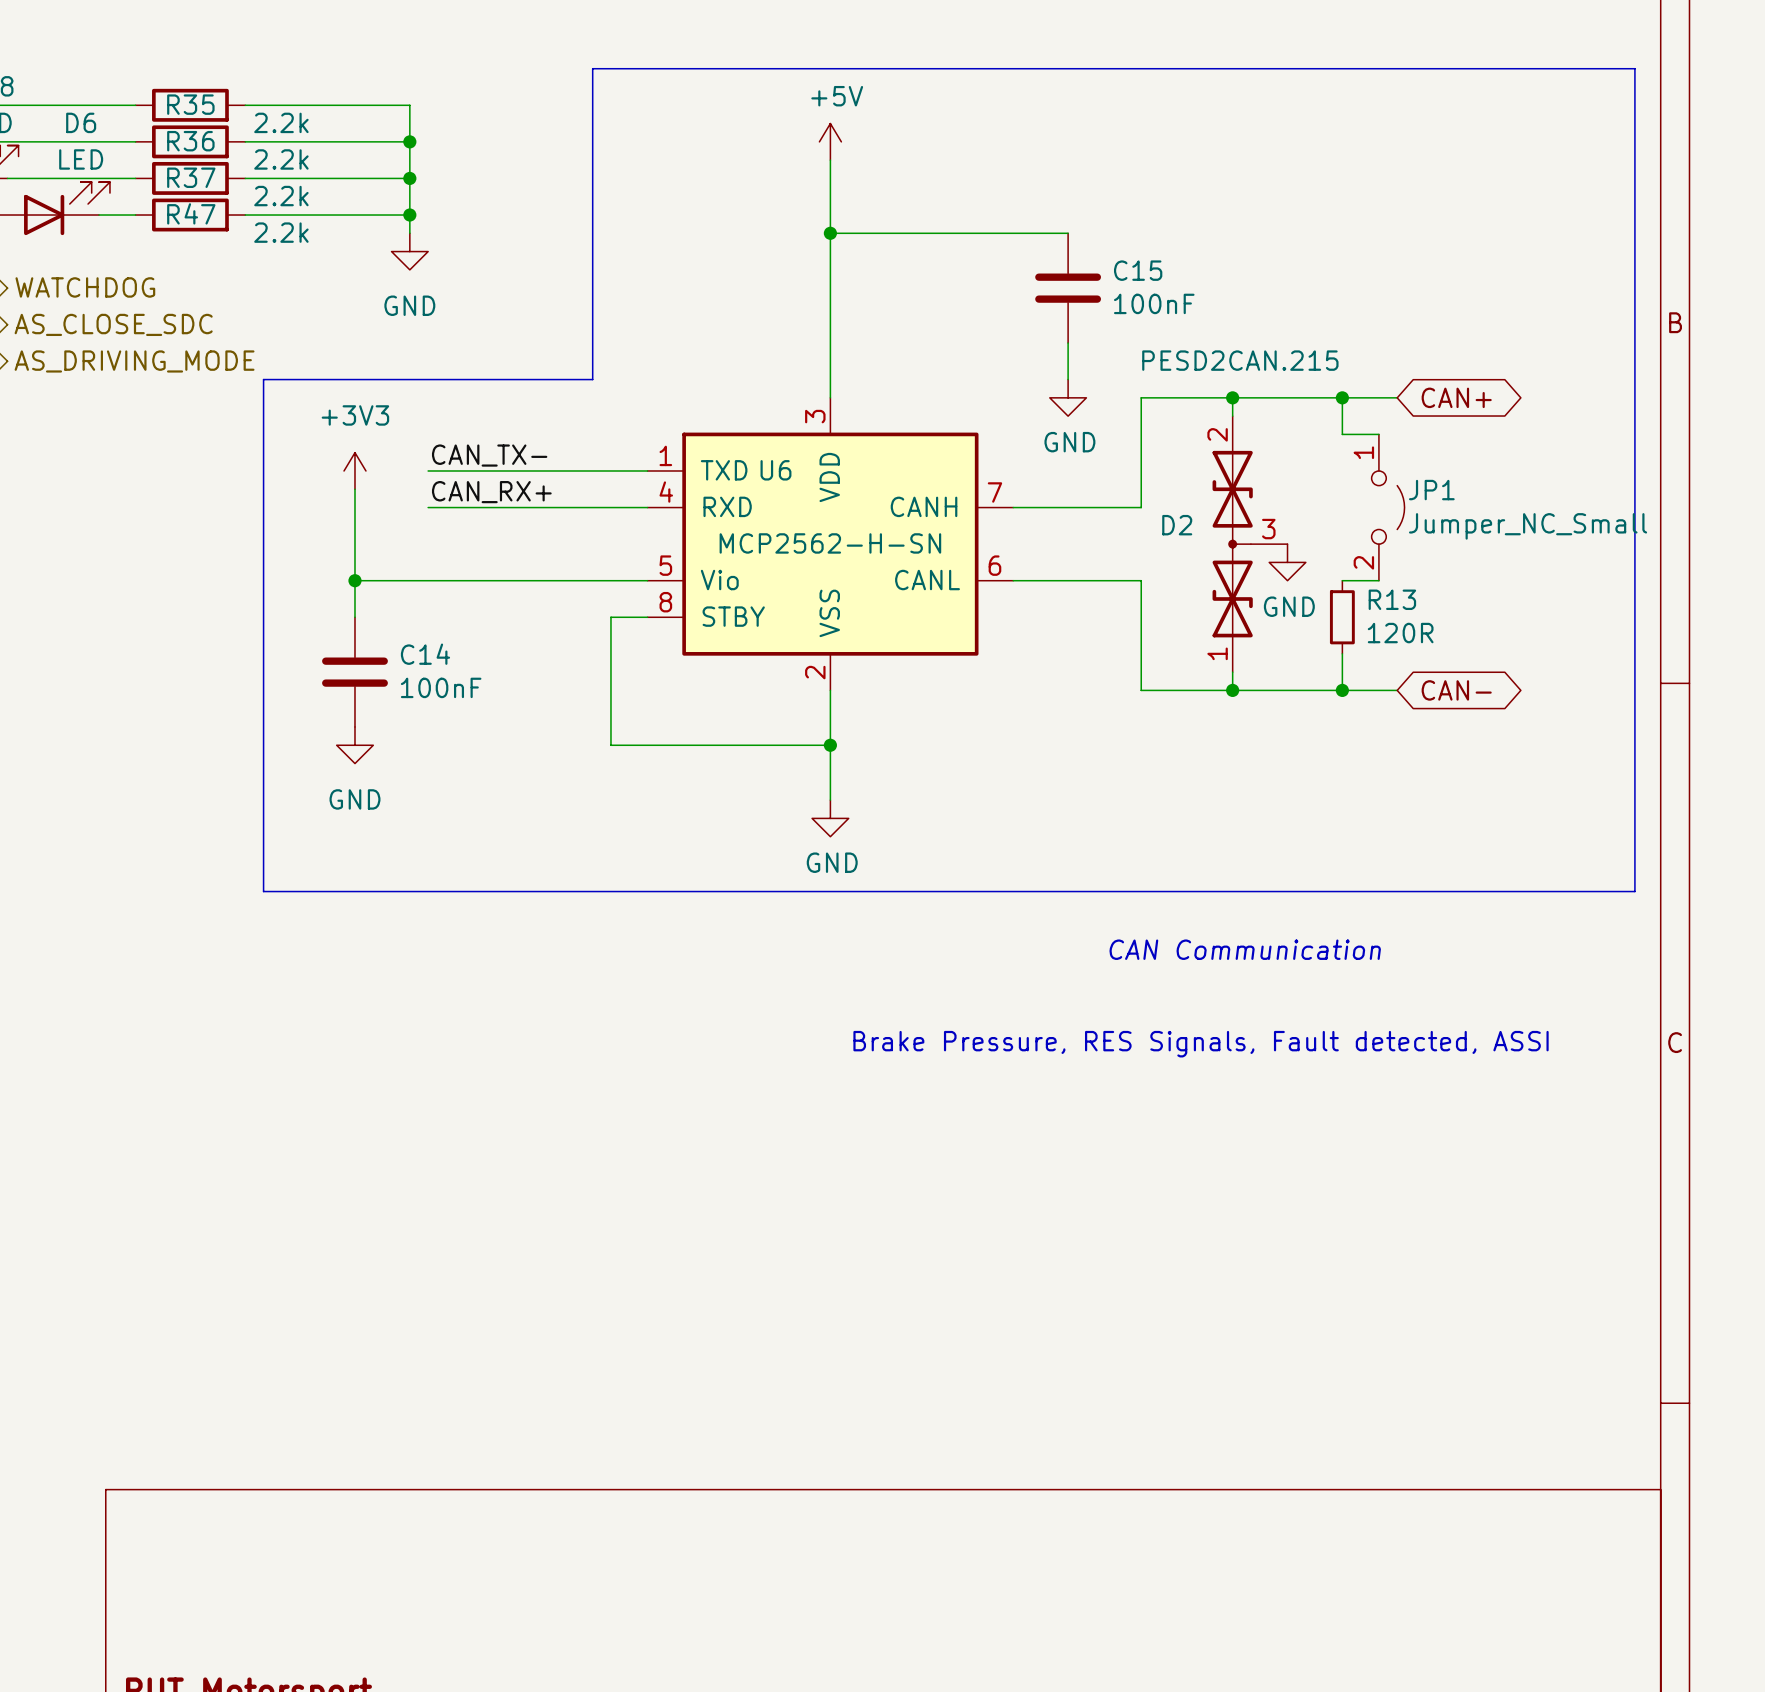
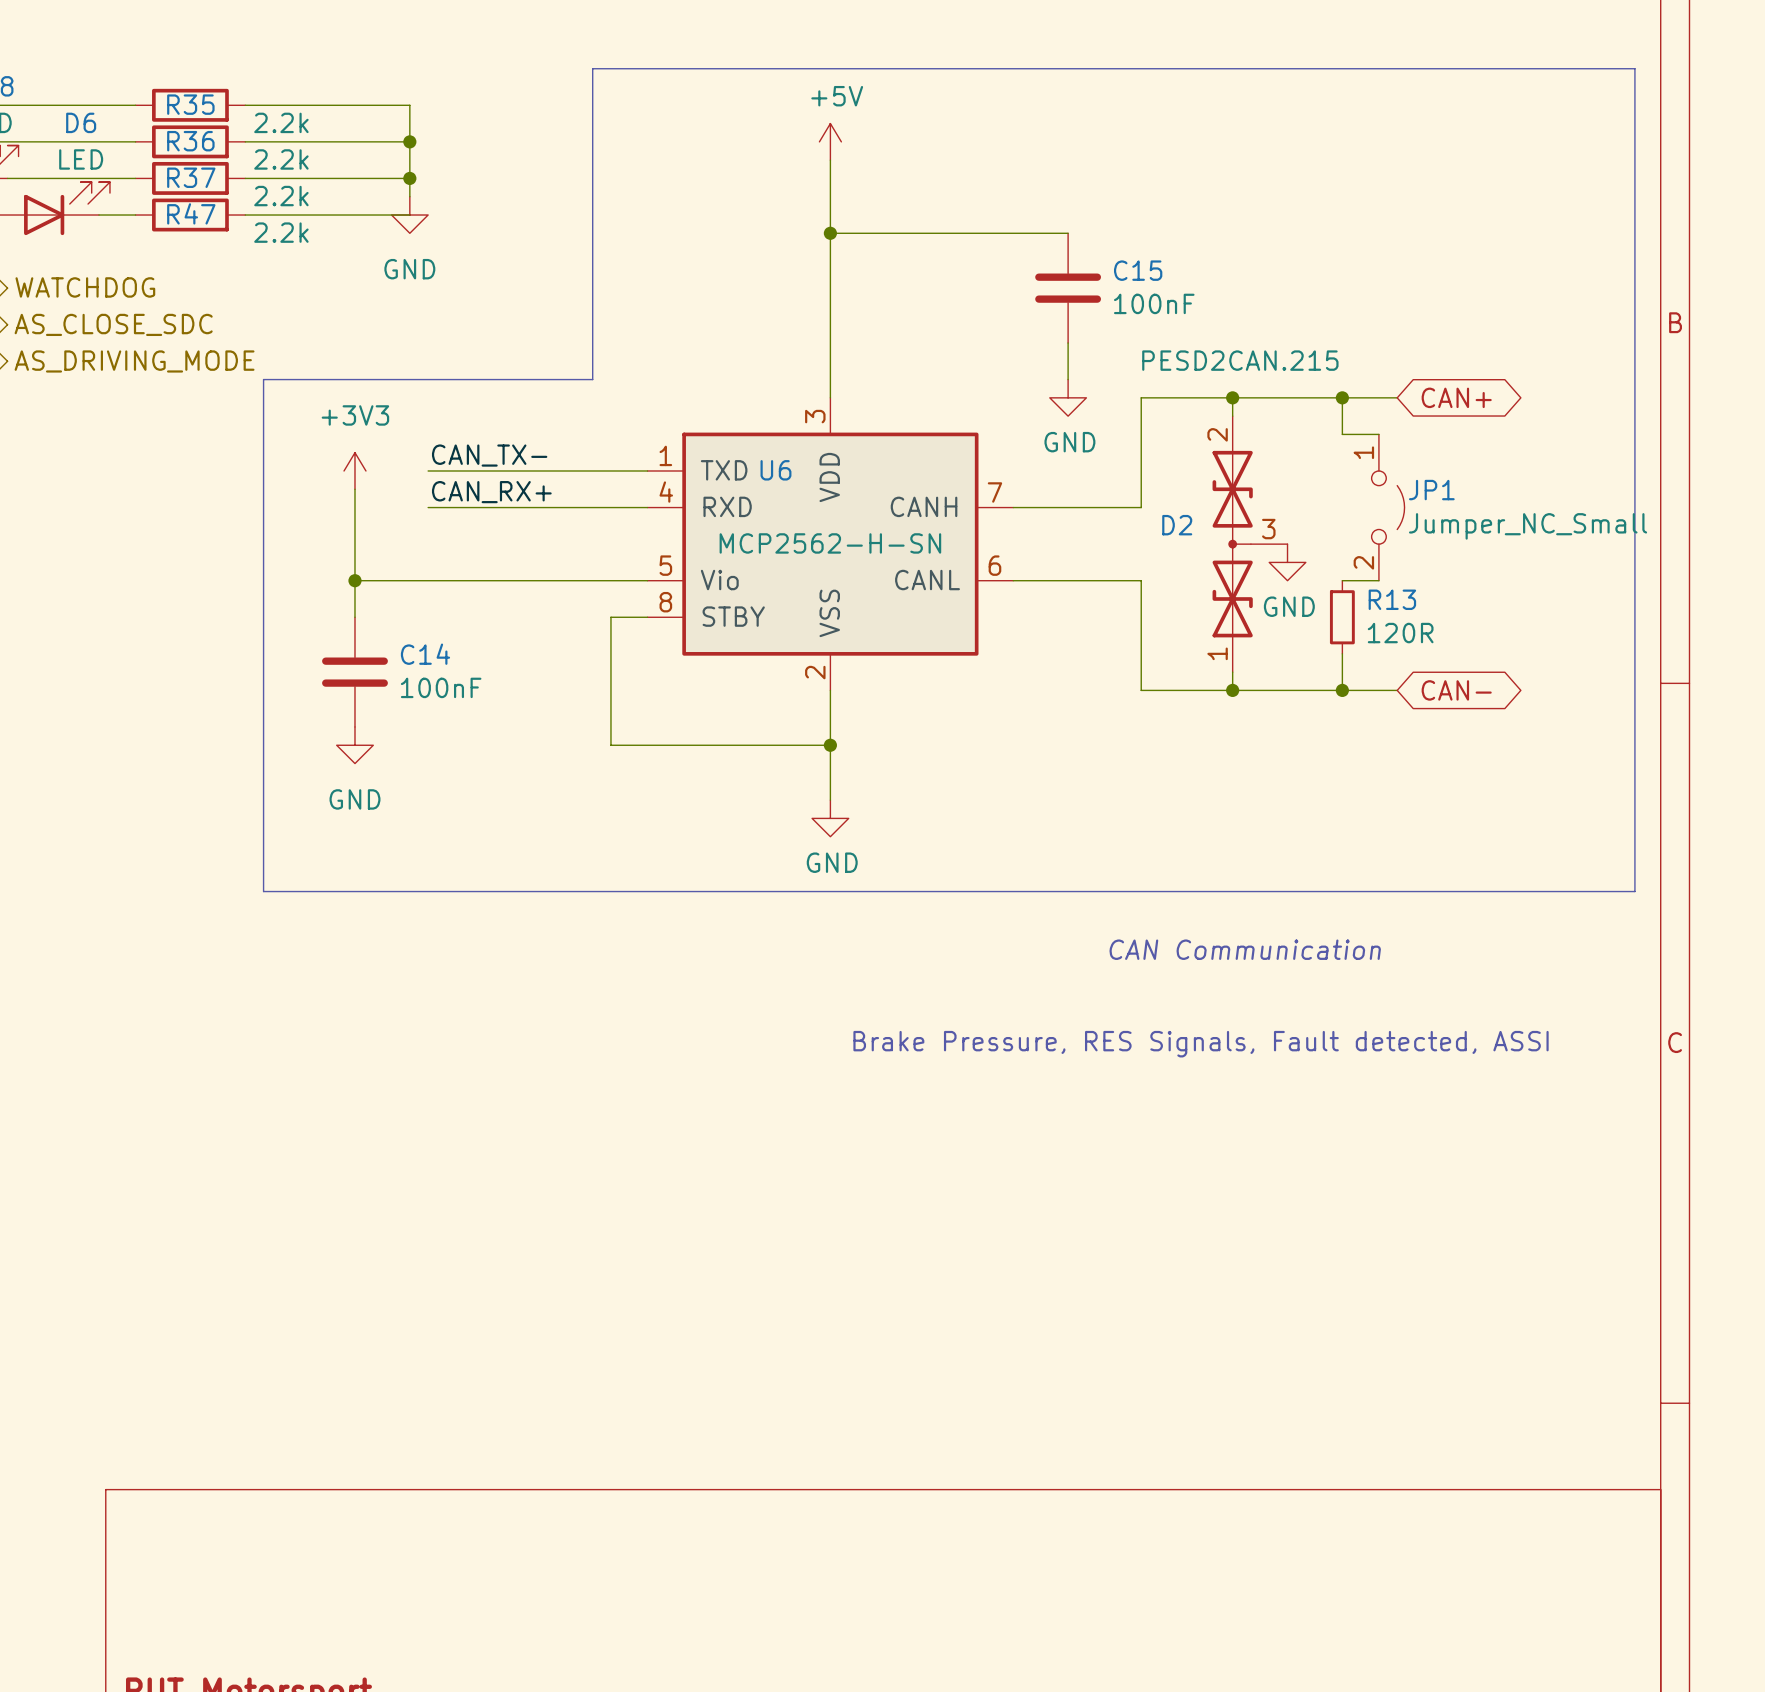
junction: (409, 215) -> none
power symbol position: GND (409, 251) -> GND (409, 215)

